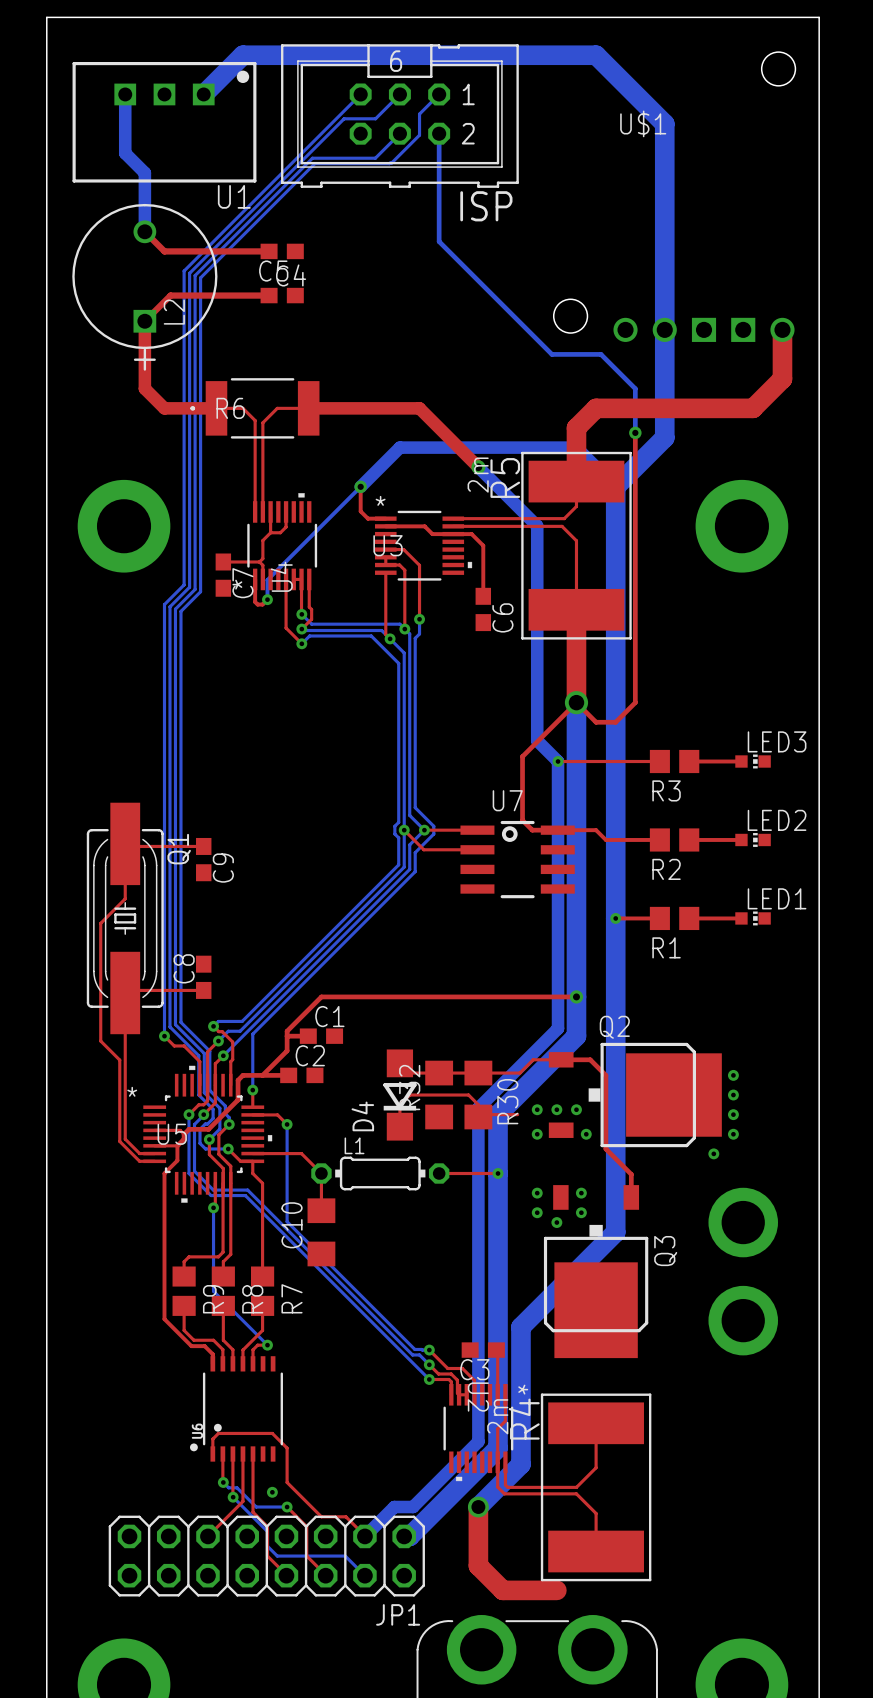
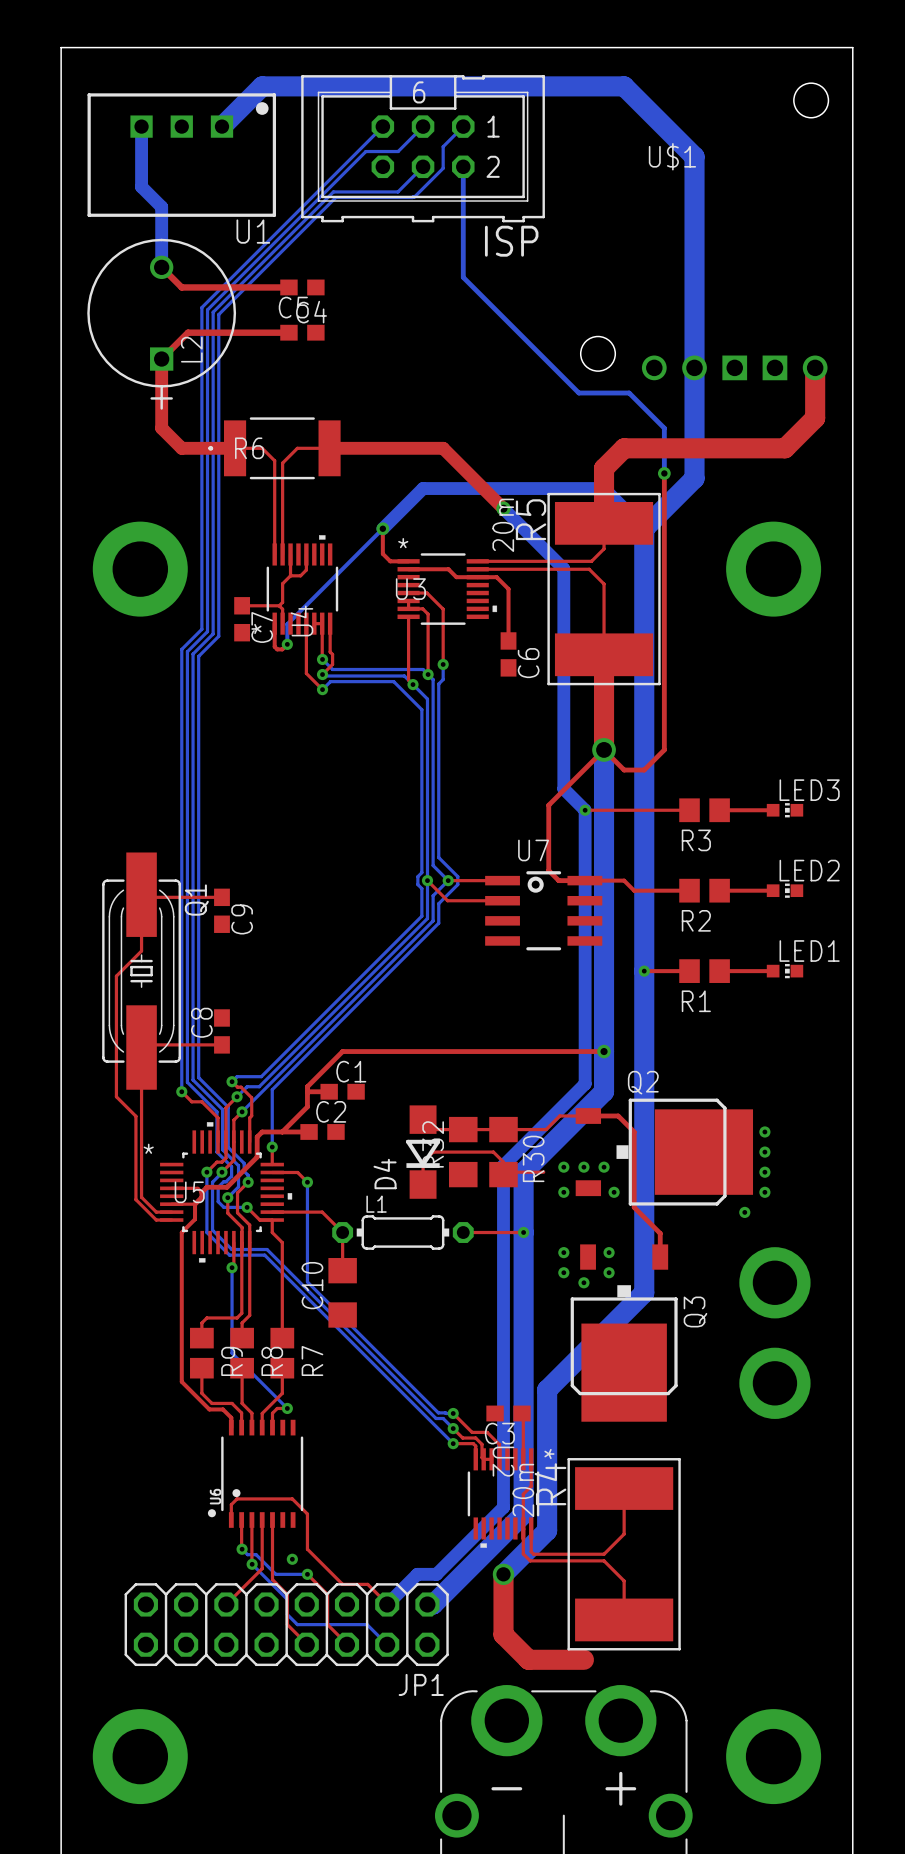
R5 value: 2m (478, 475) -> 20m (503, 525)
R4 value: 2m (497, 1416) -> 20m (523, 1490)

